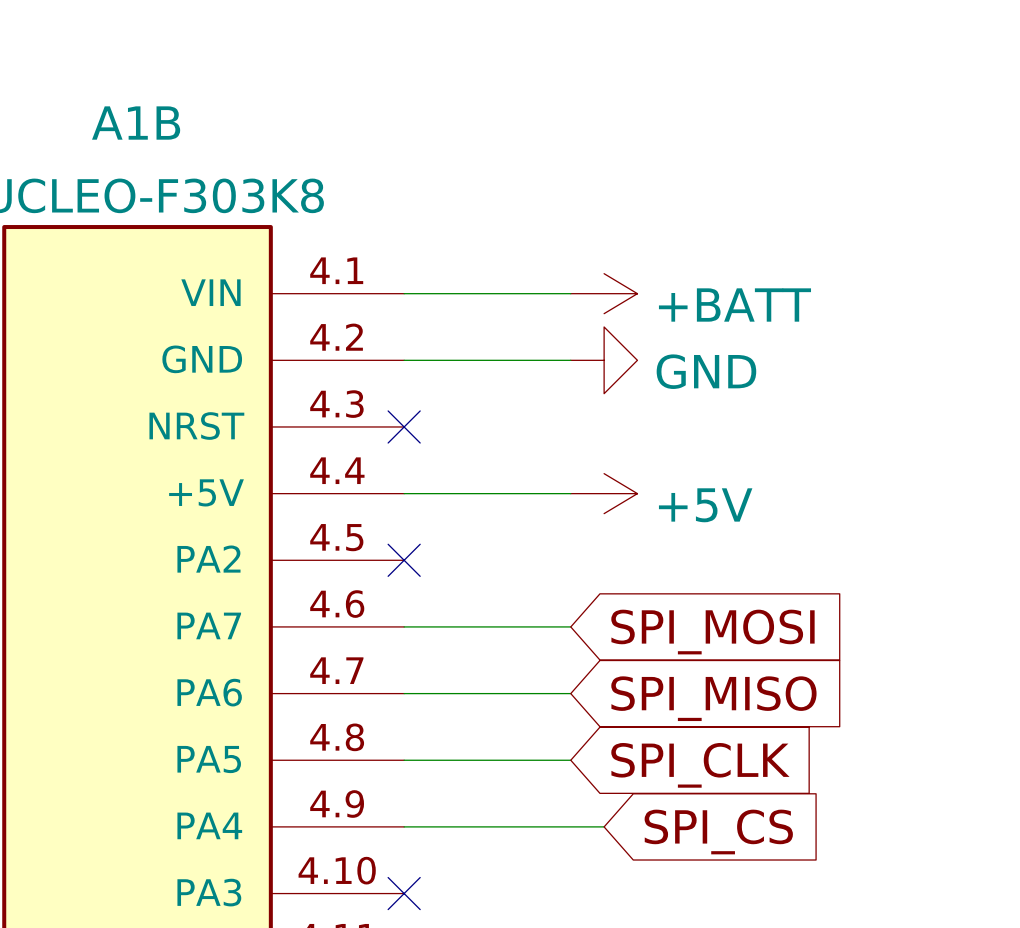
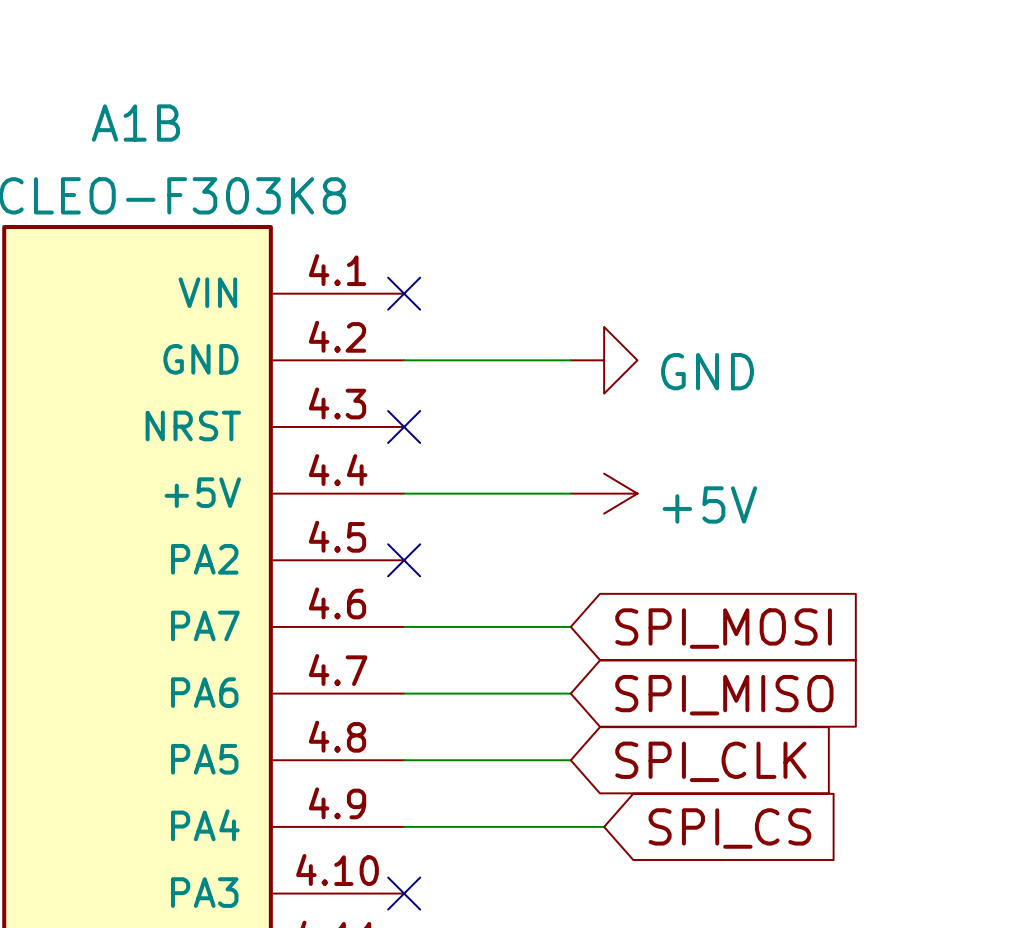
wire: (404, 293) (570, 293) -> none
no-connect mark: none -> (404, 293)
power symbol: +BATT (604, 293) -> none

